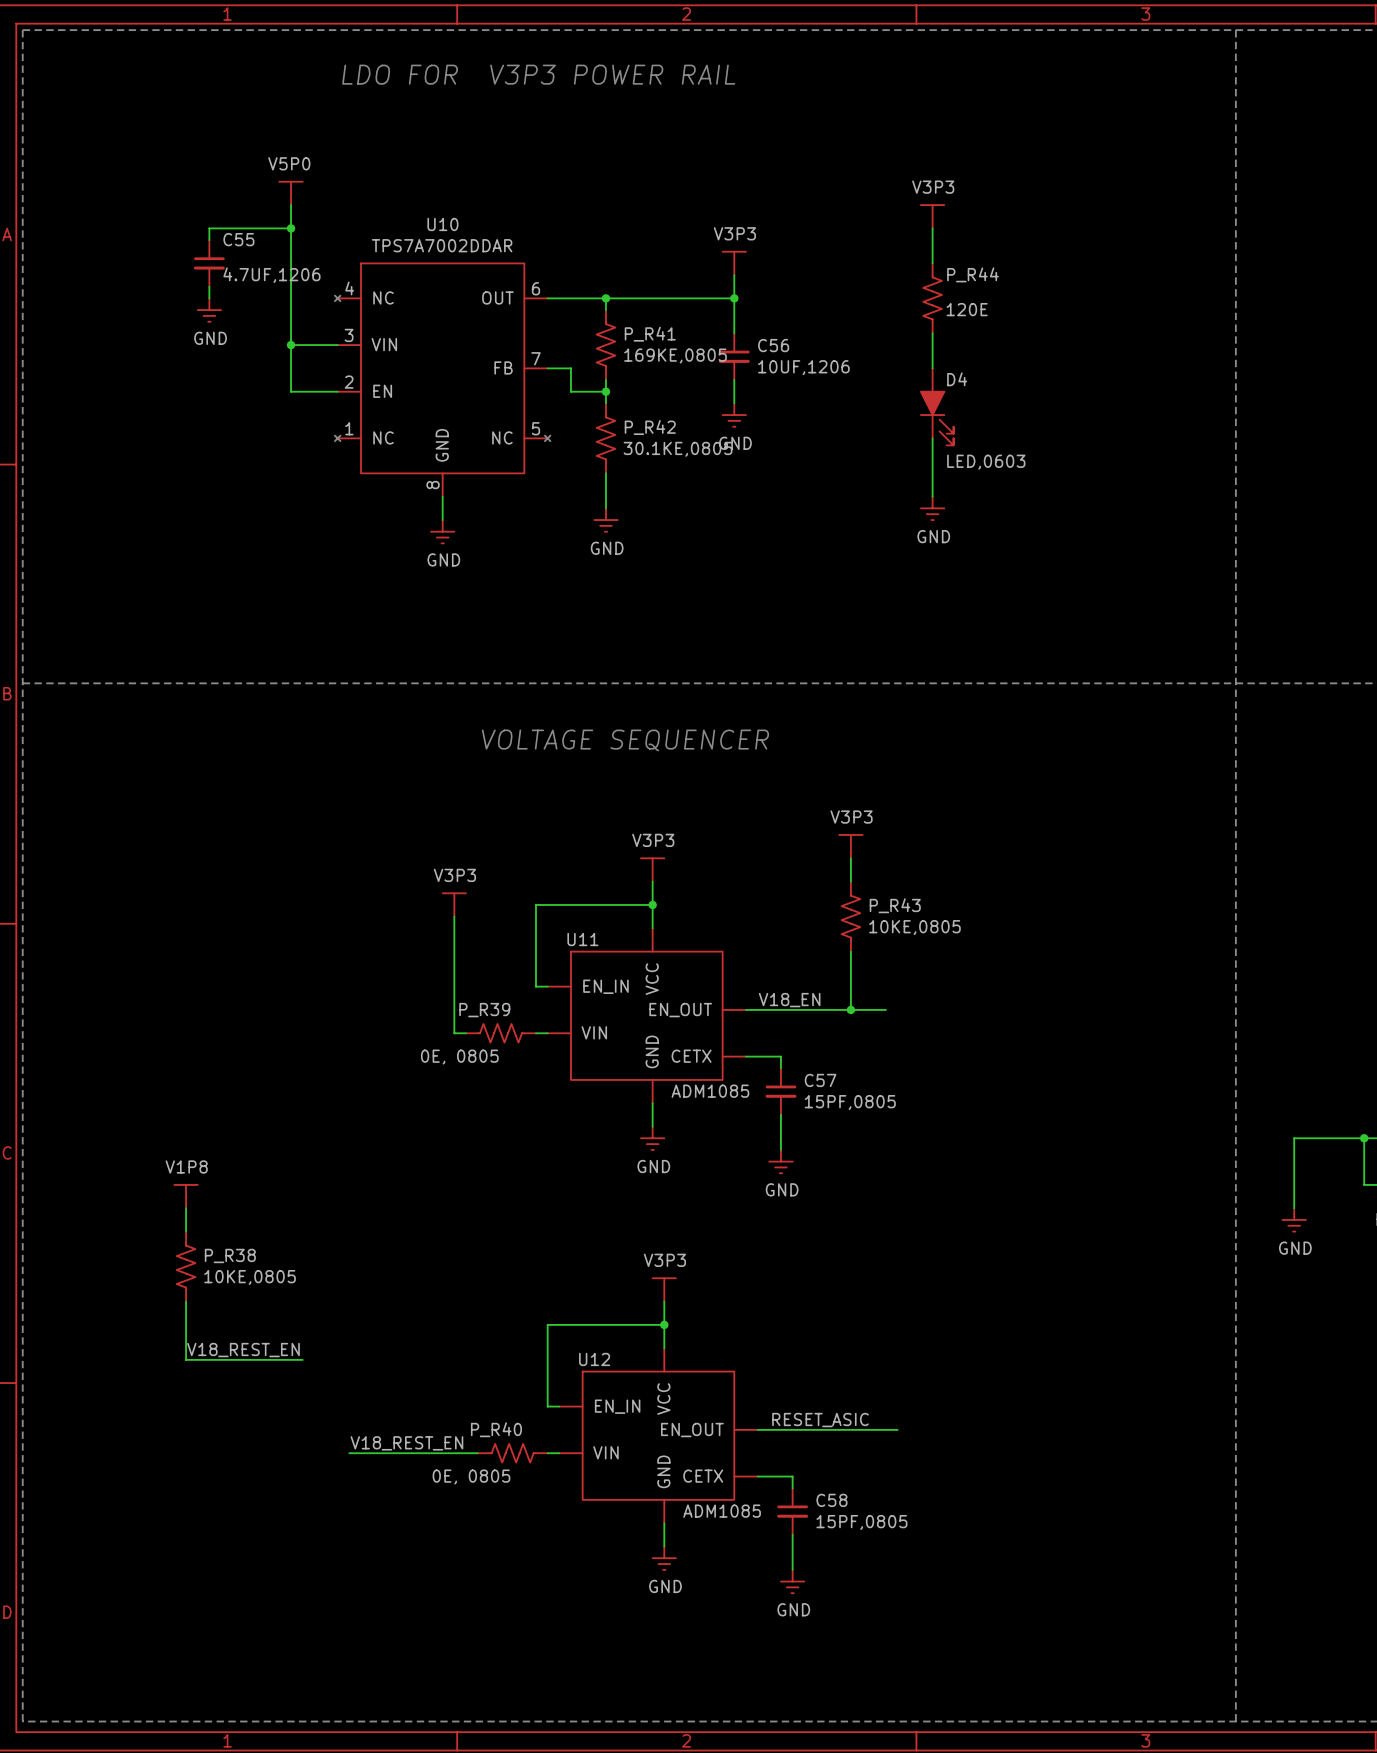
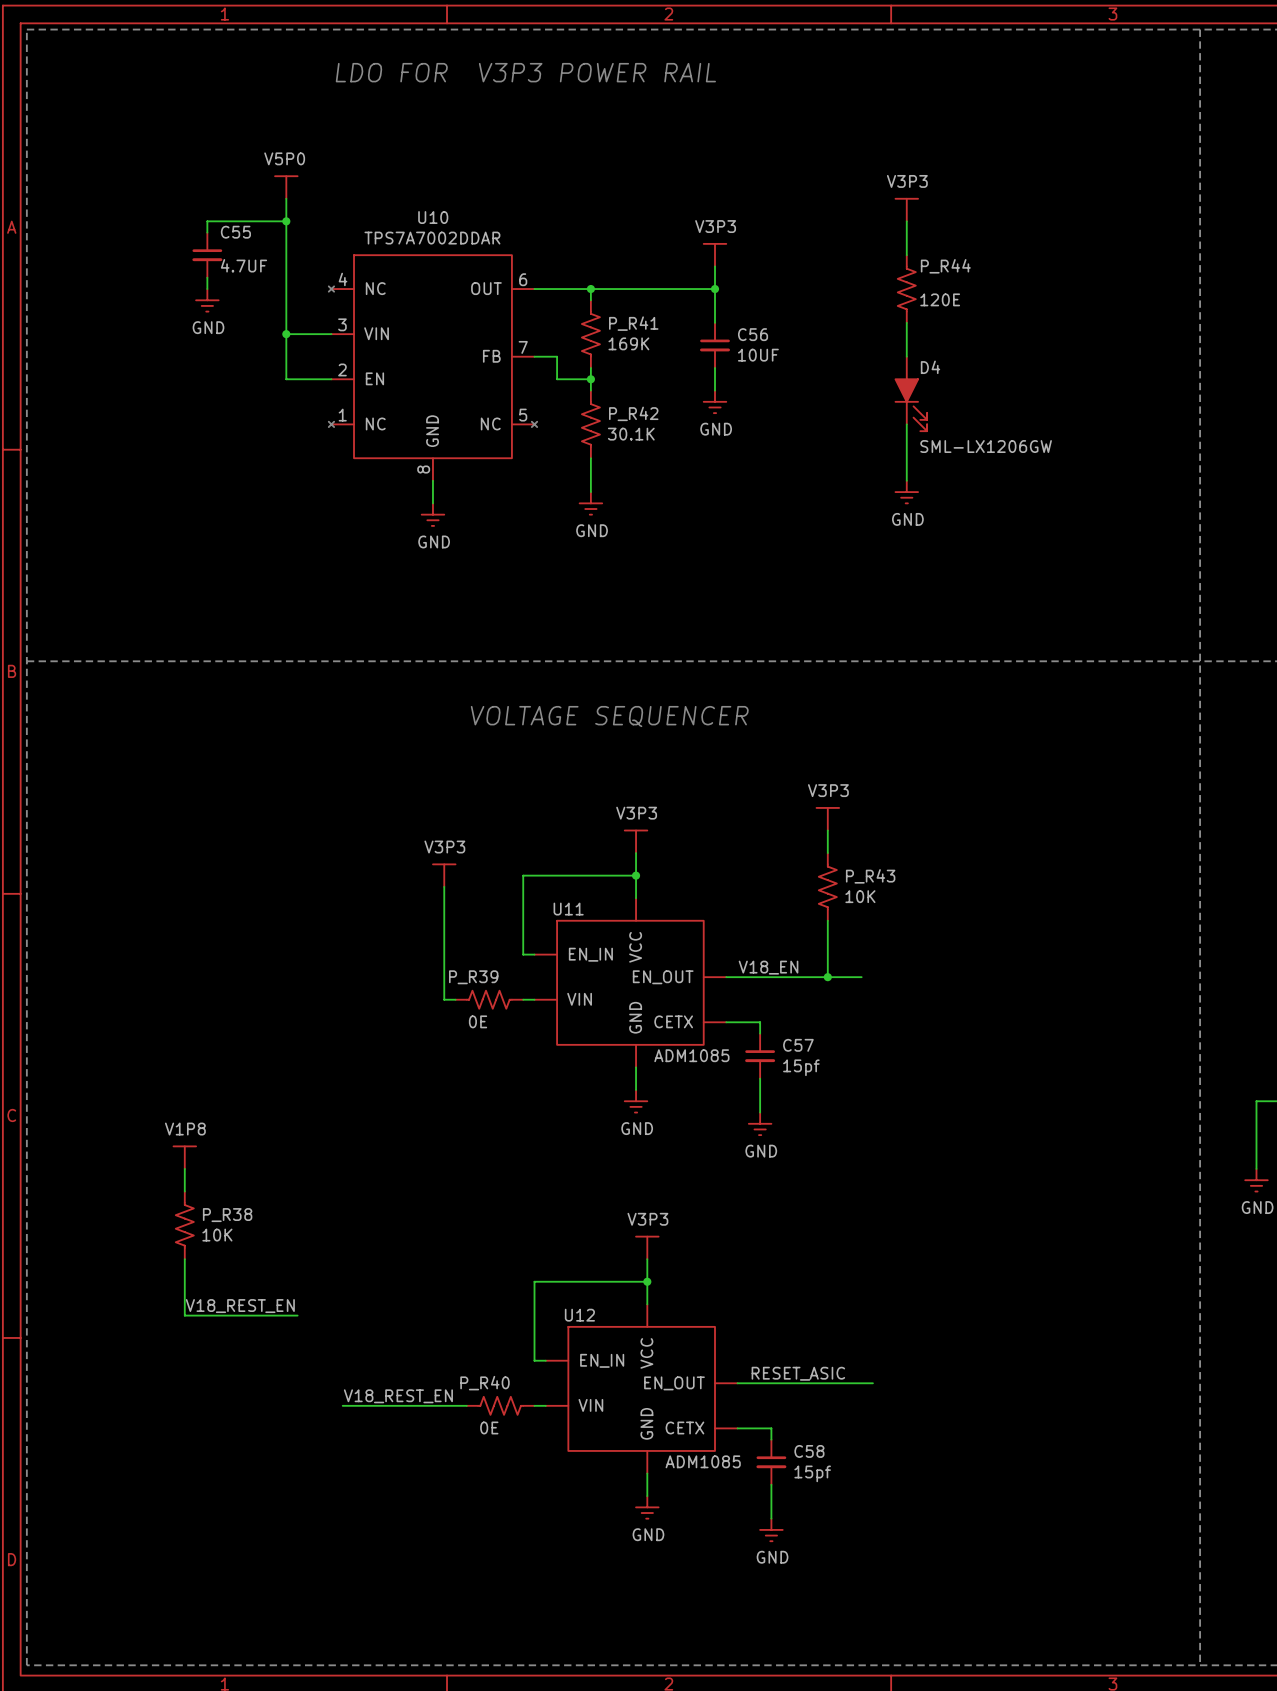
C55 value: 4.7UF,1206 (271, 275) -> 4.7UF (243, 265)
P_R41 value: 169KE,0805 (675, 355) -> 169K (628, 343)
C56 value: 10UF,1206 (803, 367) -> 10UF (758, 355)
P_R42 value: 30.1KE,0805 (678, 449) -> 30.1K (631, 434)
D4 value: LED,0603 (986, 462) -> SML-LX1206GW (986, 446)
P_R43 value: 10KE,0805 (914, 927) -> 10K (860, 896)
P_R39 value: 0E, 0805 (459, 1057) -> 0E (478, 1021)
C57 value: 15PF,0805 (850, 1102) -> 15pf (801, 1067)
P_R38 value: 10KE,0805 (250, 1277) -> 10K (217, 1235)
P_R40 value: 0E, 0805 (471, 1476) -> 0E (489, 1427)
C58 value: 15PF,0805 (861, 1522) -> 15pf (812, 1473)

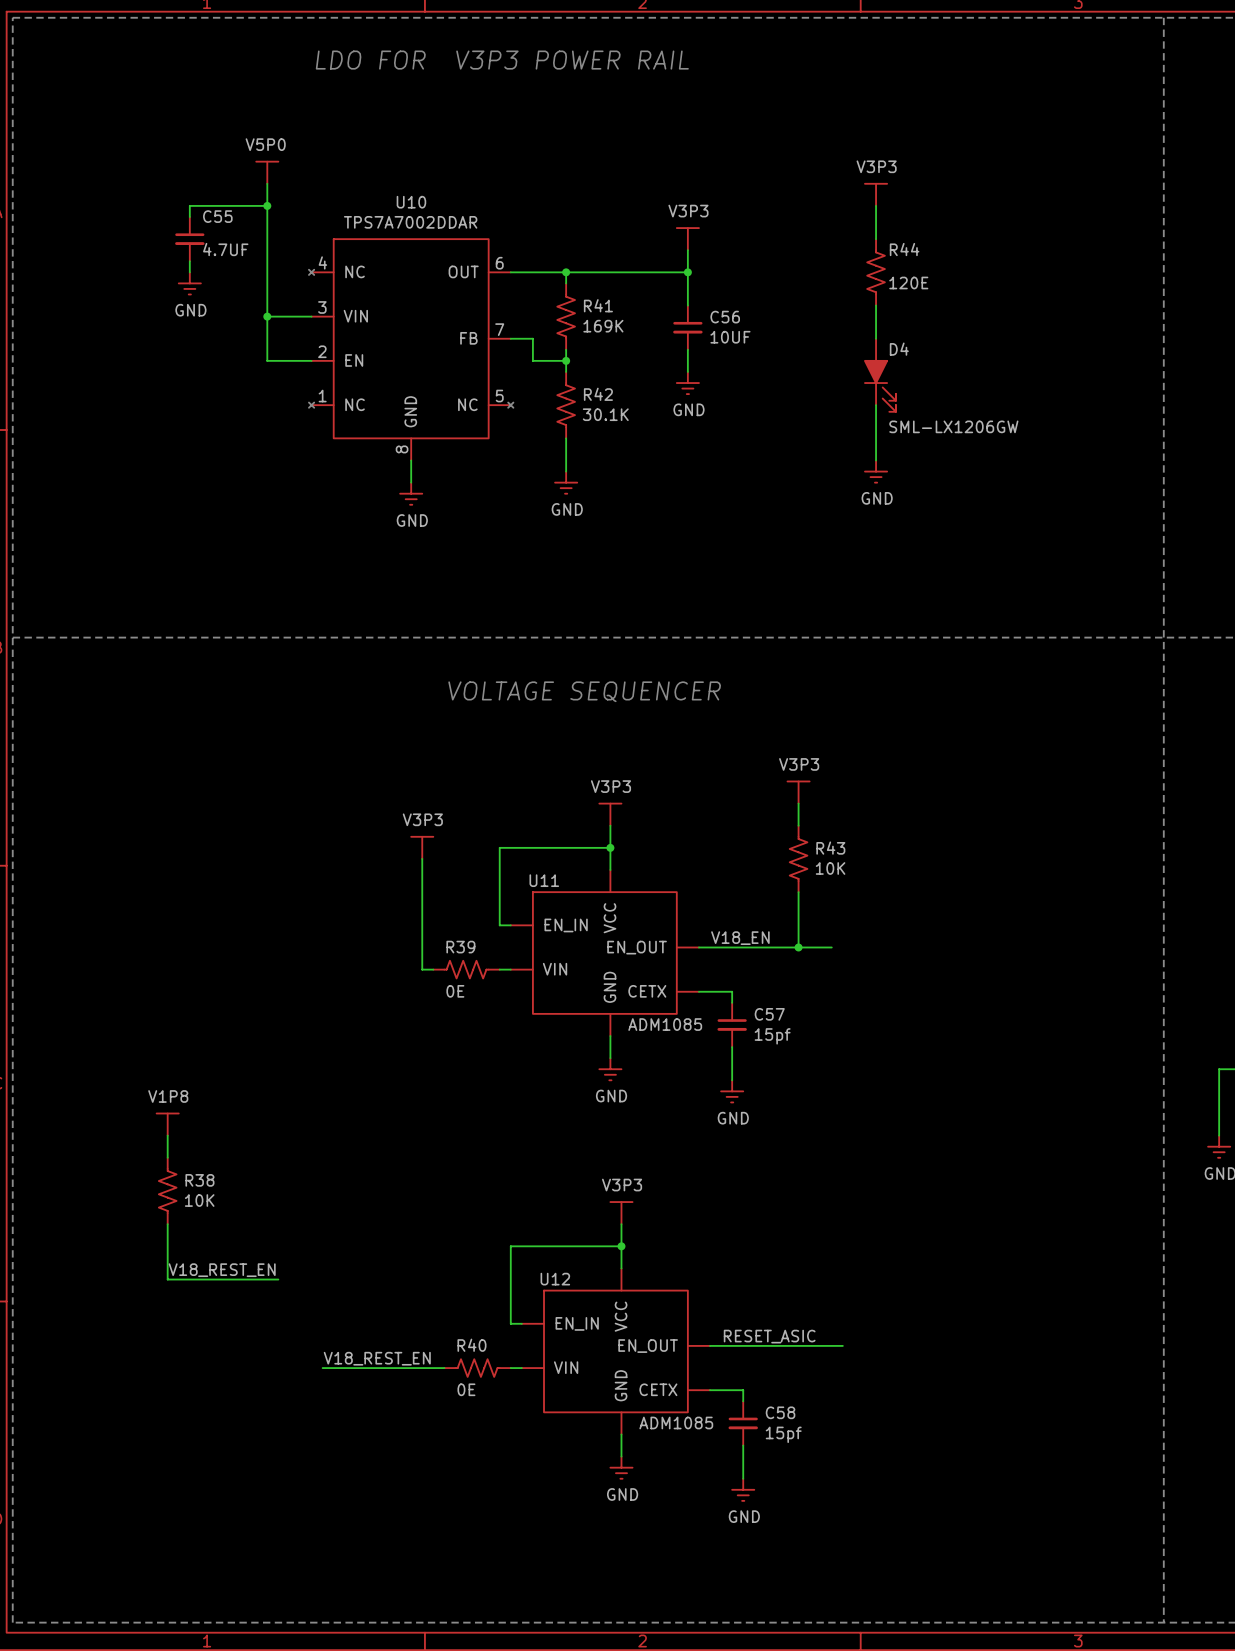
P_R44 name: P_R44 (945, 266) -> R44 (904, 249)
P_R41 name: P_R41 (633, 323) -> R41 (598, 305)
P_R42 name: P_R42 (633, 413) -> R42 (598, 394)
P_R43 name: P_R43 (870, 876) -> R43 (830, 848)
P_R39 name: P_R39 (473, 977) -> R39 (460, 947)
P_R38 name: P_R38 (227, 1215) -> R38 (199, 1180)
P_R40 name: P_R40 (485, 1383) -> R40 (471, 1345)

